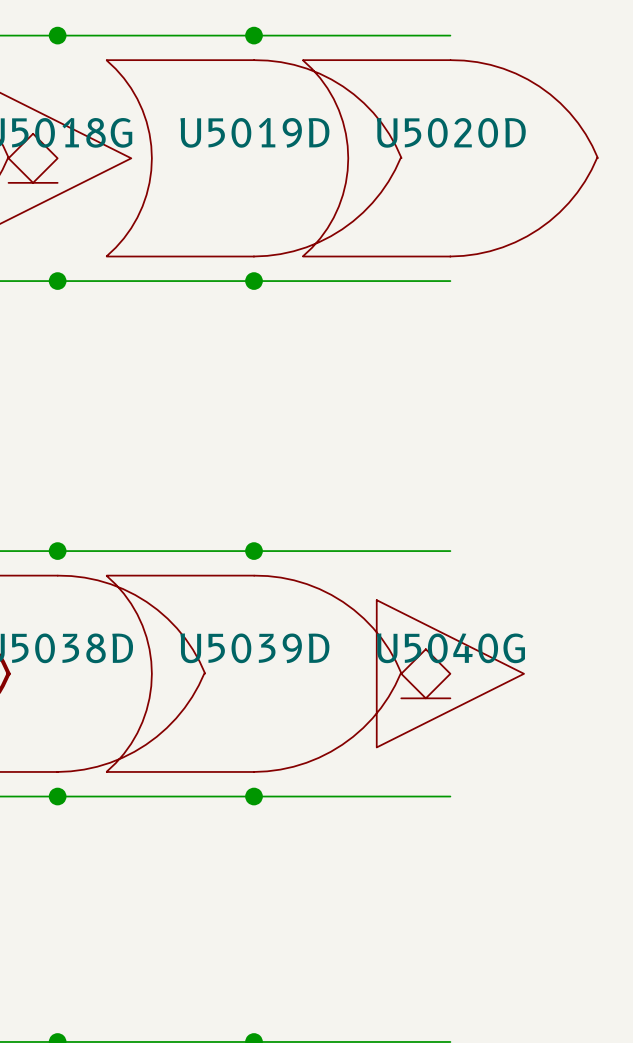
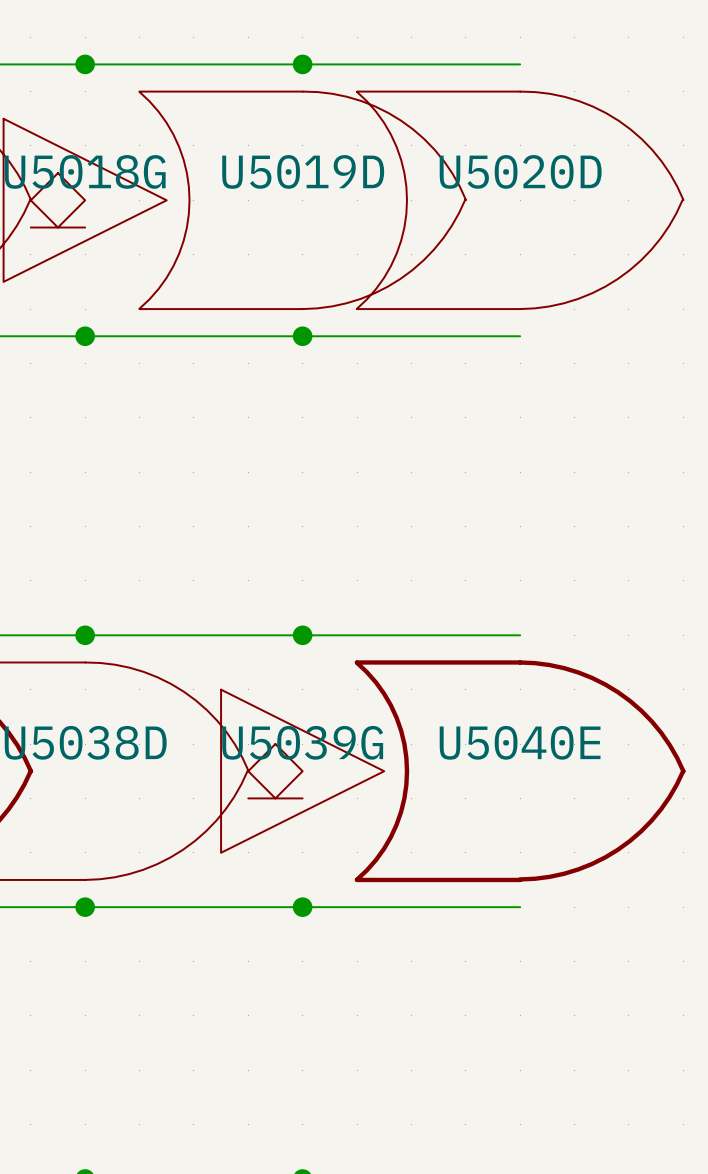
U5039D: (254, 673) -> none
U5039G: none -> (302, 771)
U5040G: (450, 673) -> none
U5040E: none -> (520, 771)

